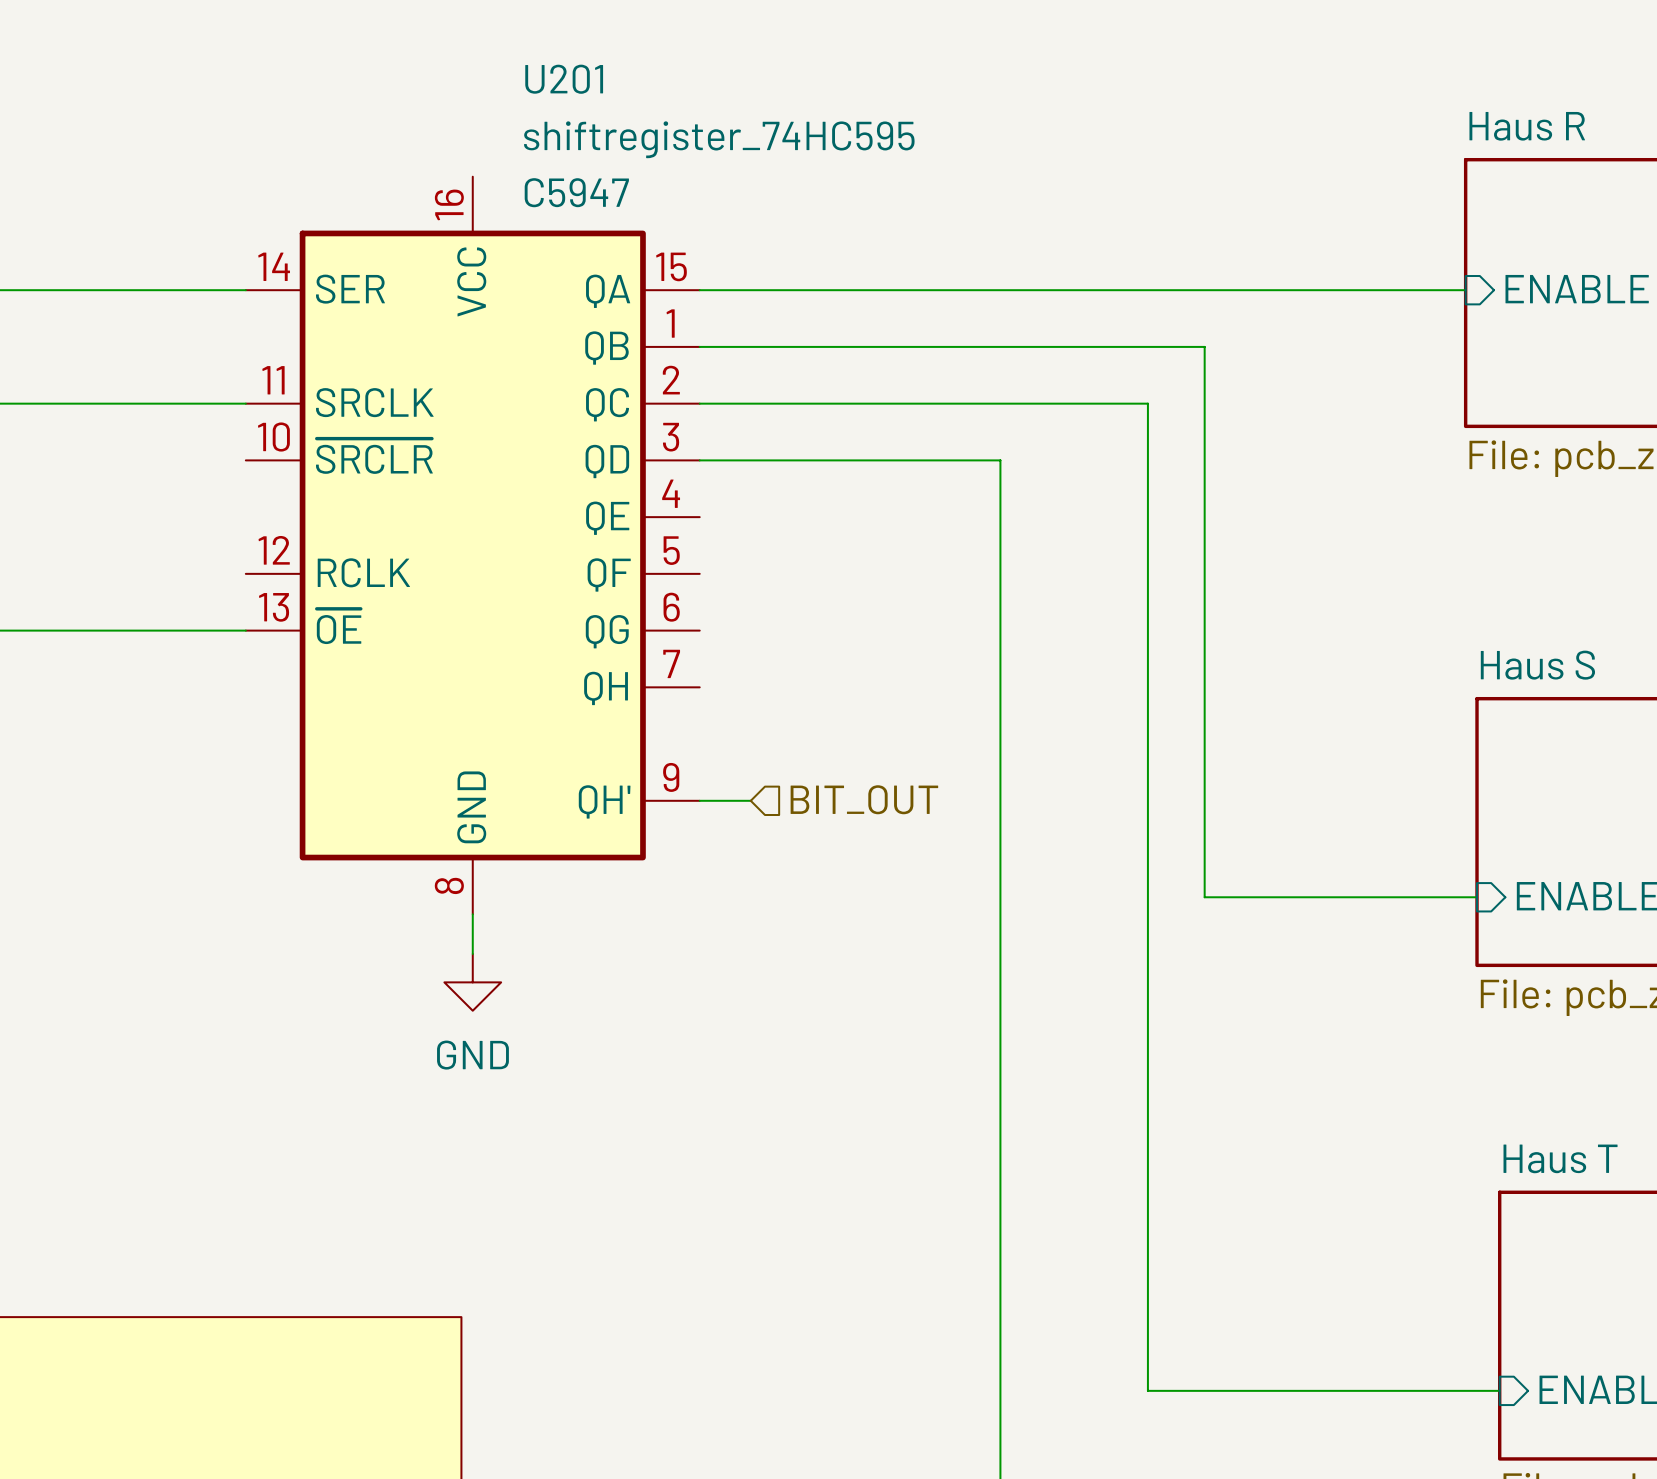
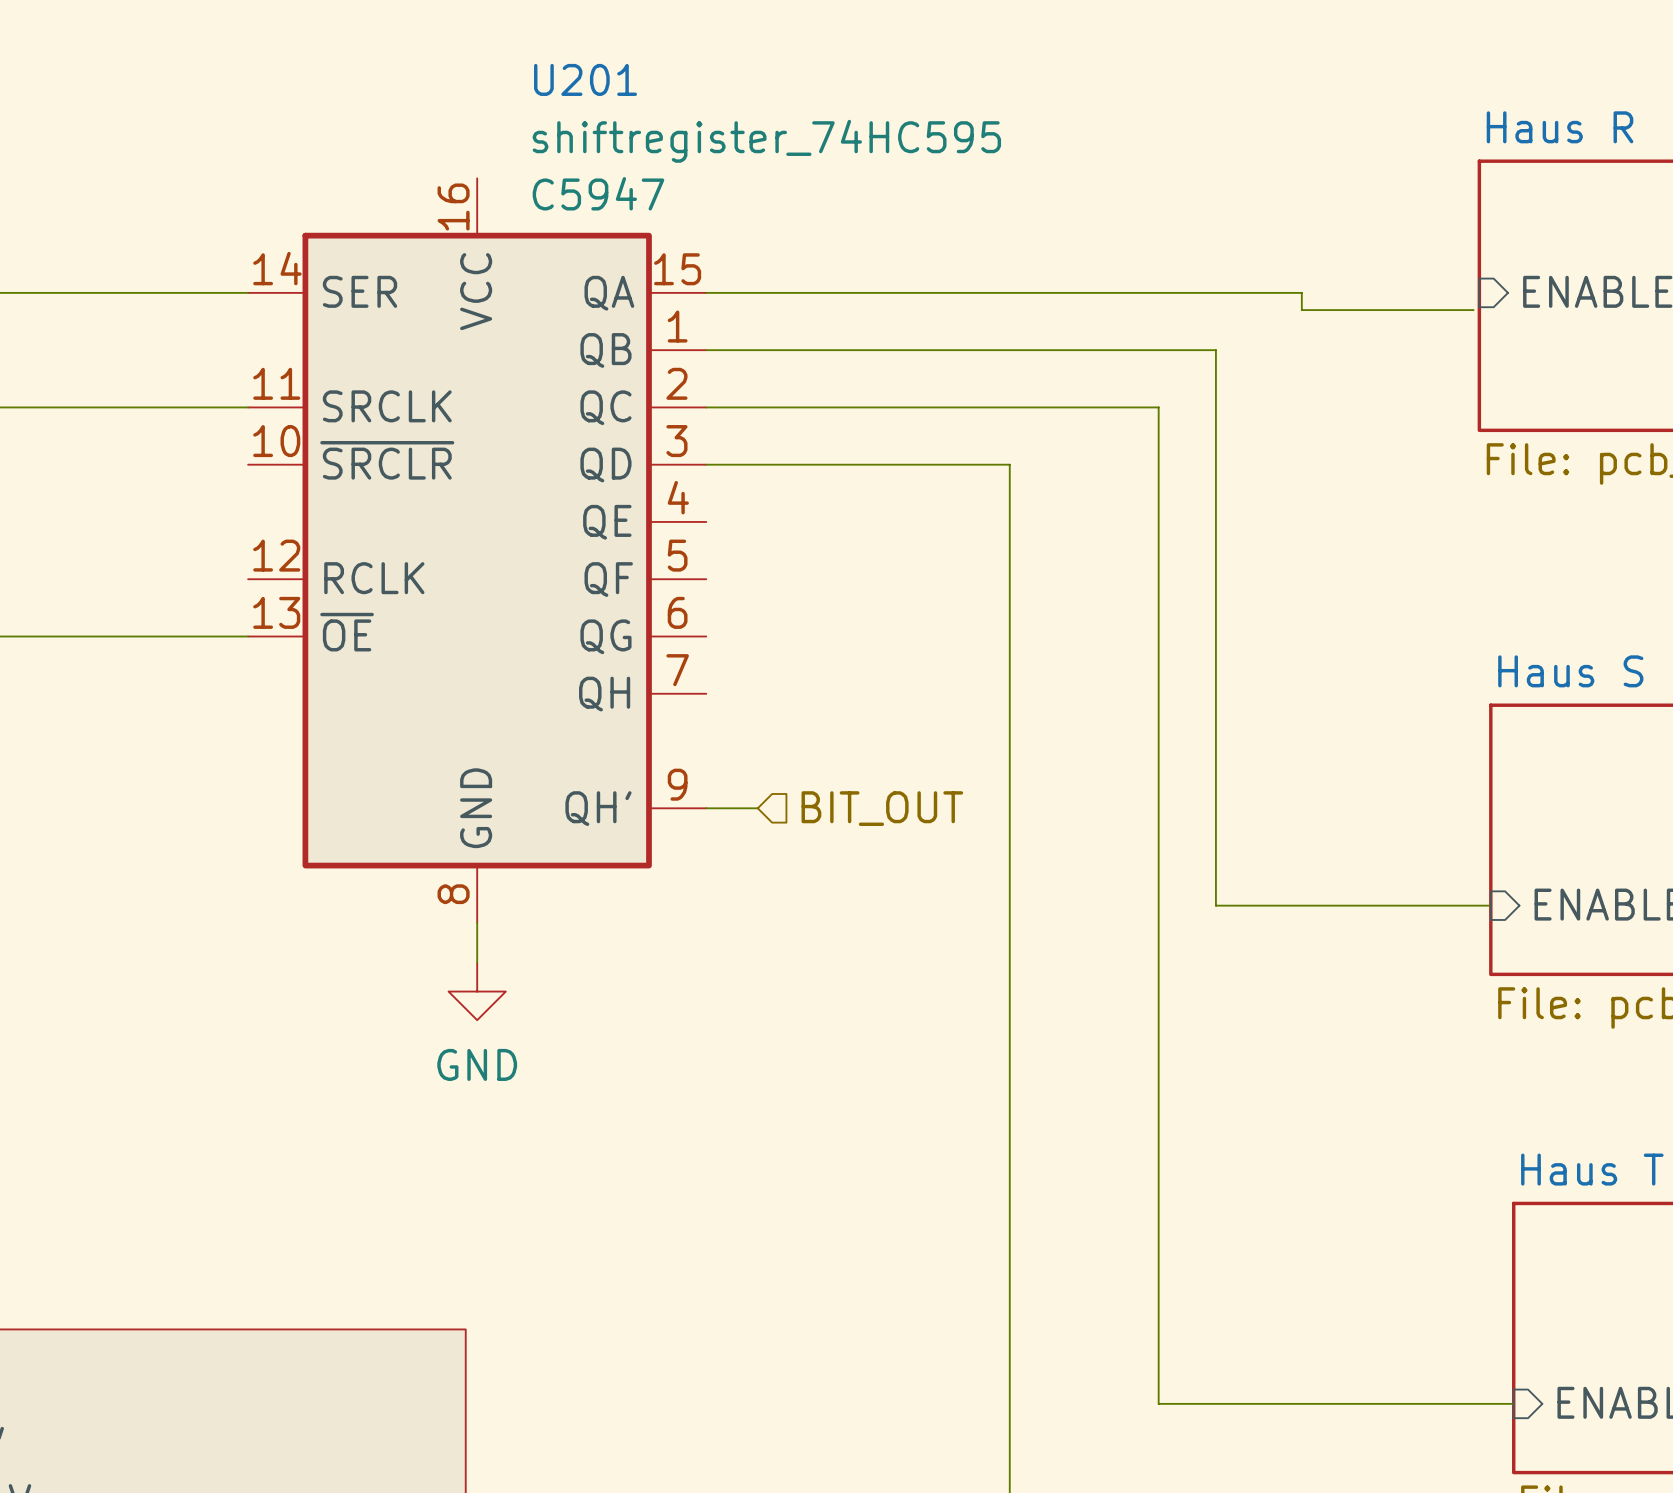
wire: (1289, 290) (1465, 290) -> (1301, 292) (1301, 310) (1473, 310)

